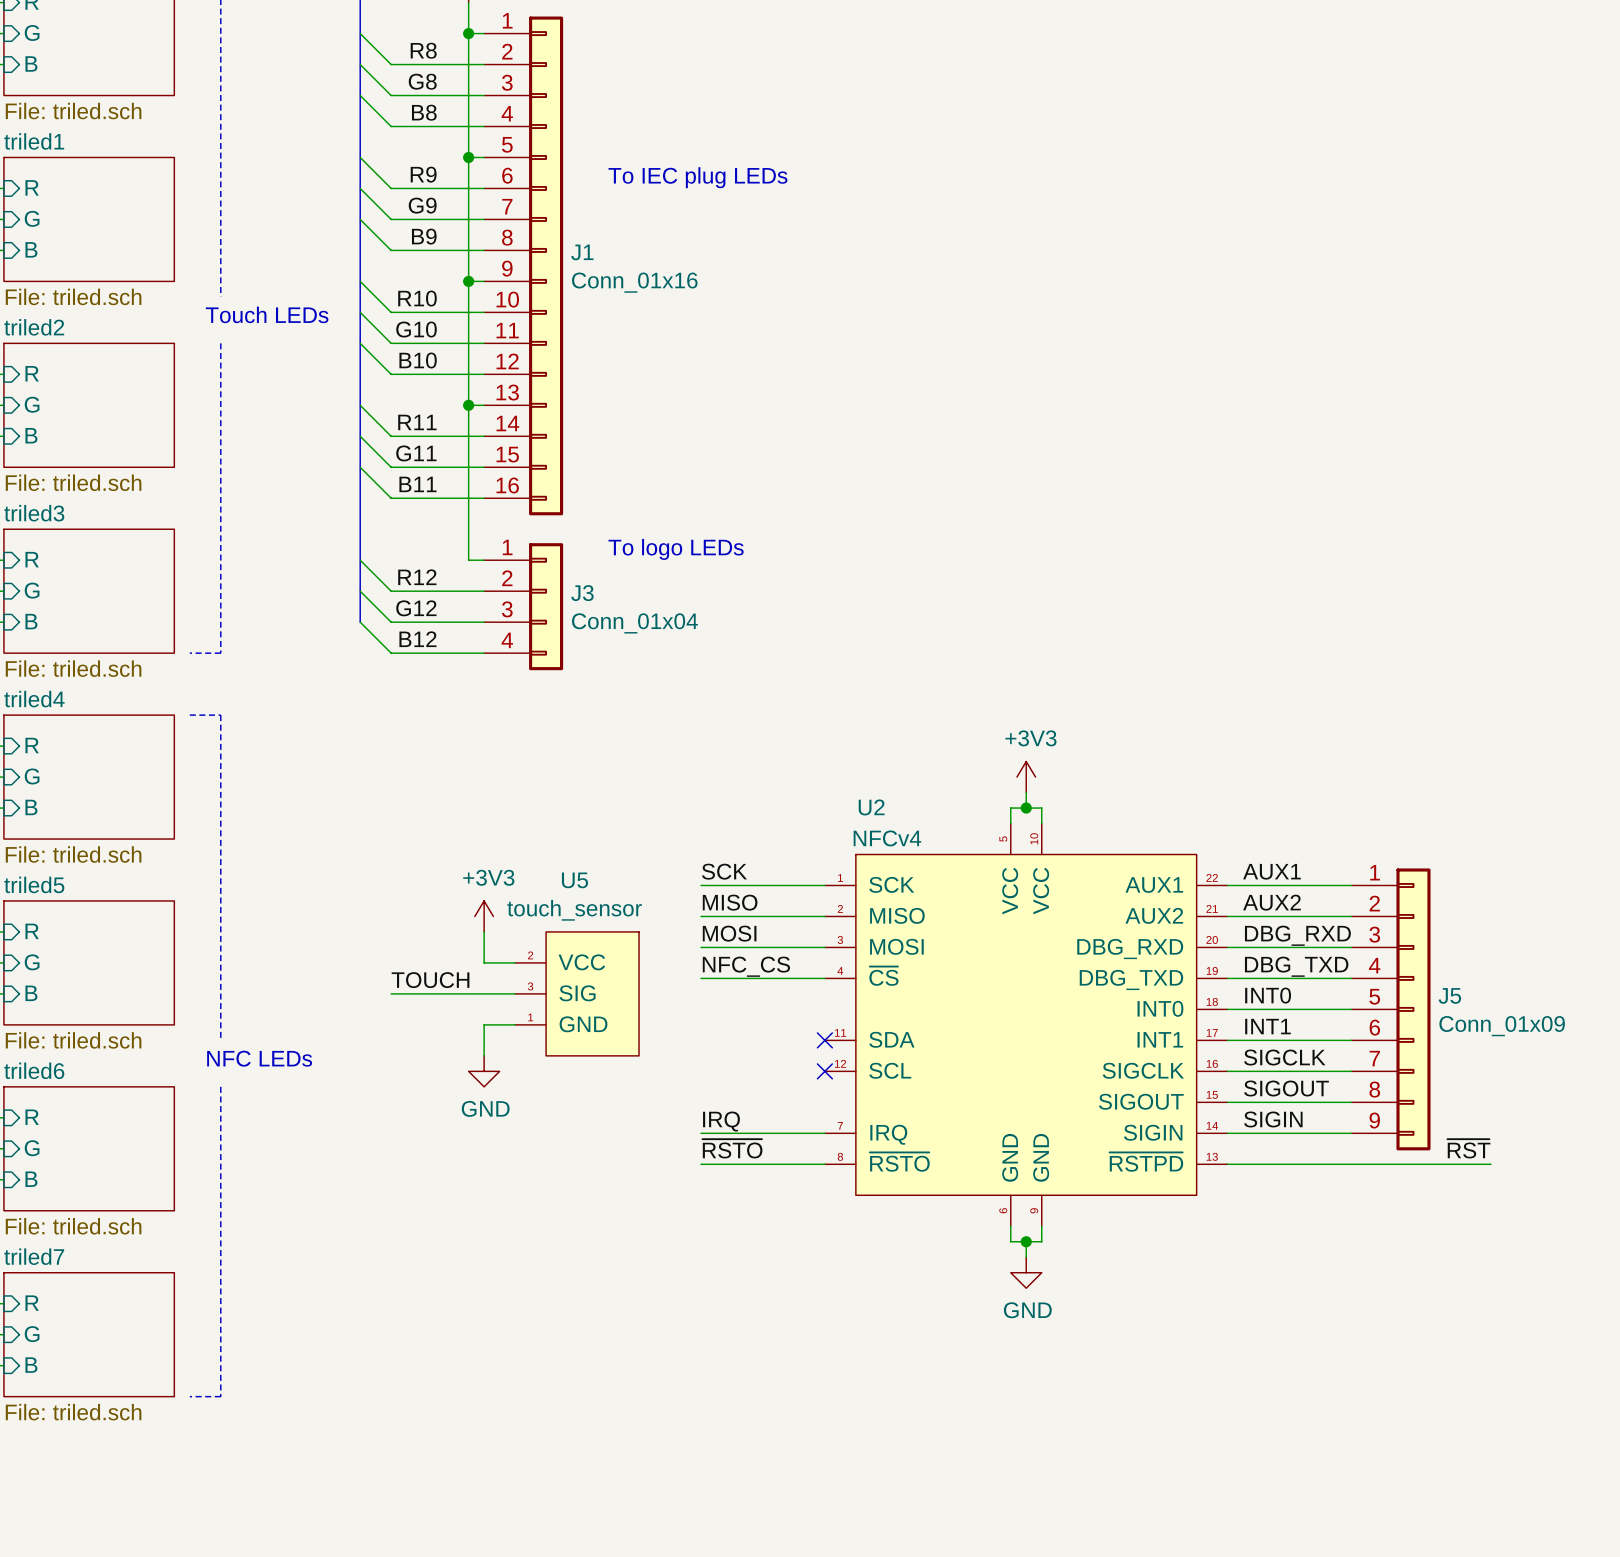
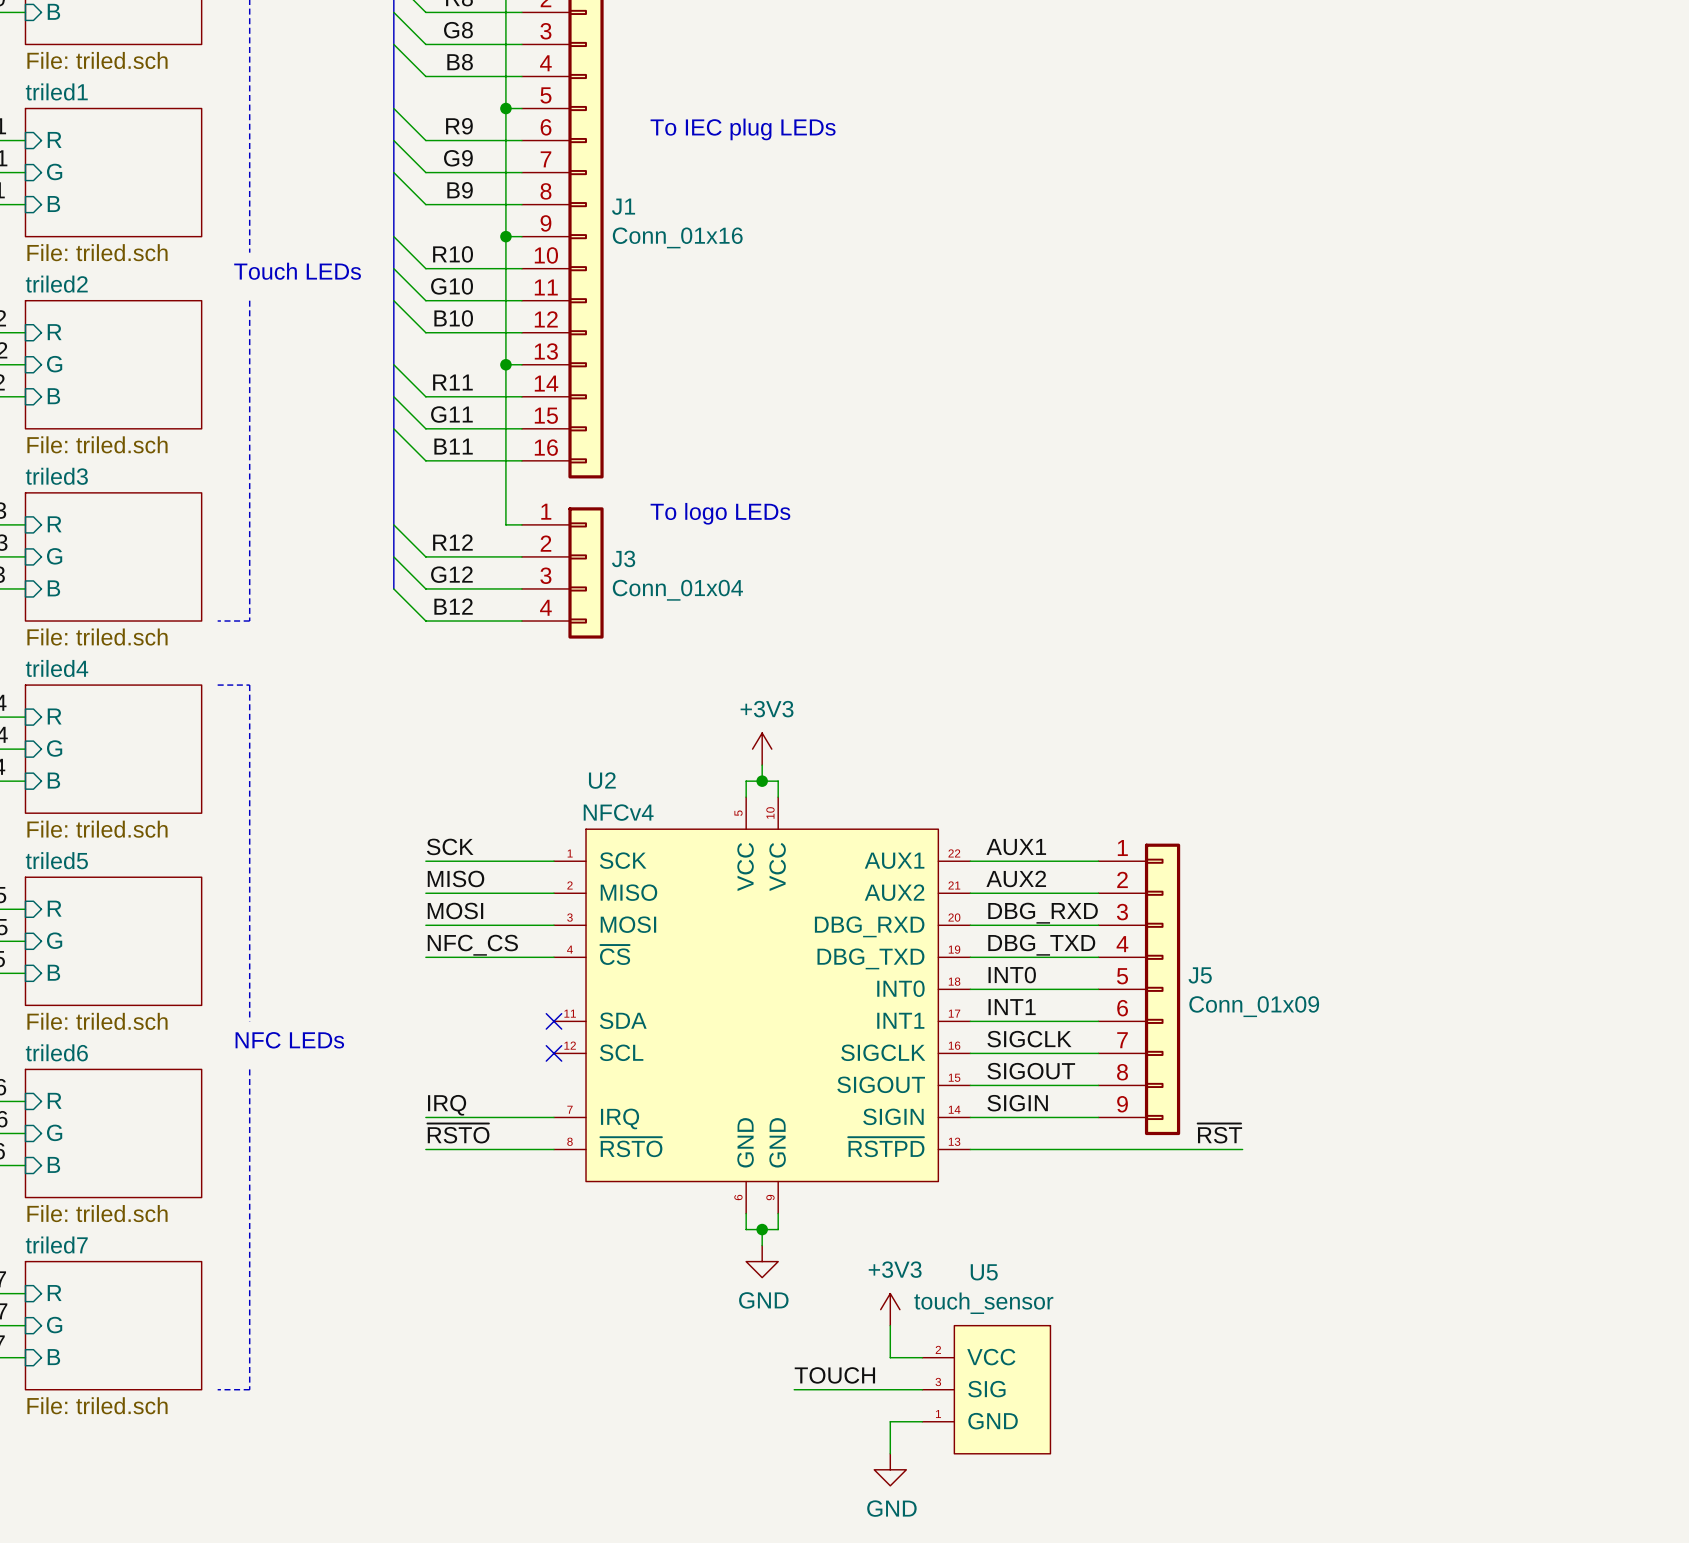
power symbol: none -> +3V3 (762, 749)
power symbol: +3V3 (1026, 777) -> none
wire: none -> (762, 765) (762, 781)
wire: (1026, 792) (1026, 808) -> none
junction: none -> (762, 781)
junction: (1026, 808) -> none
wire: none -> (746, 797) (746, 781) (778, 781) (778, 797)
wire: (1010, 823) (1010, 808) (1041, 808) (1041, 823) -> none
label: none -> SCK (450, 846)
label: SCK (724, 871) -> none
label: none -> AUX1 (1016, 847)
label: AUX1 (1271, 871) -> none
wire: none -> (425, 861) (553, 861)
wire: (1227, 885) (1351, 885) -> none
label: none -> MISO (456, 878)
label: MISO (730, 902) -> none
label: none -> AUX2 (1016, 878)
label: AUX2 (1271, 902) -> none
wire: none -> (425, 893) (553, 893)
power symbol: +3V3 (484, 916) -> none
wire: (1227, 916) (1351, 916) -> none
wire: (484, 931) (484, 962) (515, 962) -> none
label: none -> MOSI (455, 910)
label: MOSI (729, 933) -> none
label: none -> DBG_RXD (1043, 913)
label: DBG_RXD (1297, 935) -> none
wire: none -> (425, 925) (553, 925)
wire: (1227, 947) (1351, 947) -> none
label: none -> NFC_CS (472, 945)
label: NFC_CS (746, 966) -> none
label: none -> DBG_TXD (1041, 945)
label: DBG_TXD (1296, 966) -> none
wire: (1227, 978) (1351, 978) -> none
label: TOUCH (430, 980) -> none
wire: (391, 993) (515, 993) -> (425, 957) (553, 957)
U5 position: (577, 993) -> (986, 1389)
label: none -> INT0 (1012, 975)
label: INT0 (1268, 995) -> none
wire: (1227, 1009) (1351, 1009) -> none
J5 position: (1391, 1009) -> (1139, 989)
wire: (515, 1024) (484, 1024) (484, 1055) -> none
U2 position: (1026, 1024) -> (762, 1005)
label: none -> INT1 (1012, 1007)
label: INT1 (1267, 1026) -> none
no-connect mark: none -> (553, 1021)
no-connect mark: (824, 1040) -> none
wire: (1227, 1040) (1351, 1040) -> none
label: none -> SIGCLK (1029, 1039)
label: SIGCLK (1284, 1057) -> none
power symbol: GND (484, 1071) -> none
no-connect mark: none -> (553, 1053)
no-connect mark: (824, 1071) -> none
wire: (1227, 1071) (1351, 1071) -> none
label: none -> SIGOUT (1031, 1071)
label: SIGOUT (1286, 1088) -> none
wire: (1227, 1102) (1351, 1102) -> none
label: none -> SIGIN (1017, 1103)
label: SIGIN (1273, 1119) -> none
label: none -> IRQ (447, 1105)
label: IRQ (721, 1121) -> none
wire: none -> (425, 1117) (553, 1117)
wire: (1227, 1133) (1351, 1133) -> none
label: none -> ~{RSTO} (458, 1133)
label: ~{RSTO} (732, 1148) -> none
label: none -> ~{RST} (1219, 1133)
label: ~{RST} (1468, 1148) -> none
wire: none -> (425, 1149) (553, 1149)
wire: (1227, 1164) (1490, 1164) -> none
wire: none -> (746, 1213) (746, 1229) (778, 1229) (778, 1213)
wire: (1010, 1226) (1010, 1241) (1041, 1241) (1041, 1226) -> none
wire: none -> (762, 1229) (762, 1245)
junction: none -> (762, 1229)
wire: (1026, 1241) (1026, 1257) -> none
junction: (1026, 1241) -> none
power symbol: none -> GND (762, 1261)
power symbol: GND (1026, 1272) -> none
power symbol: none -> +3V3 (890, 1309)
wire: none -> (890, 1325) (890, 1357) (922, 1357)
label: none -> TOUCH (834, 1375)
wire: none -> (794, 1389) (922, 1389)
wire: none -> (922, 1421) (890, 1421) (890, 1453)
power symbol: none -> GND (890, 1469)

